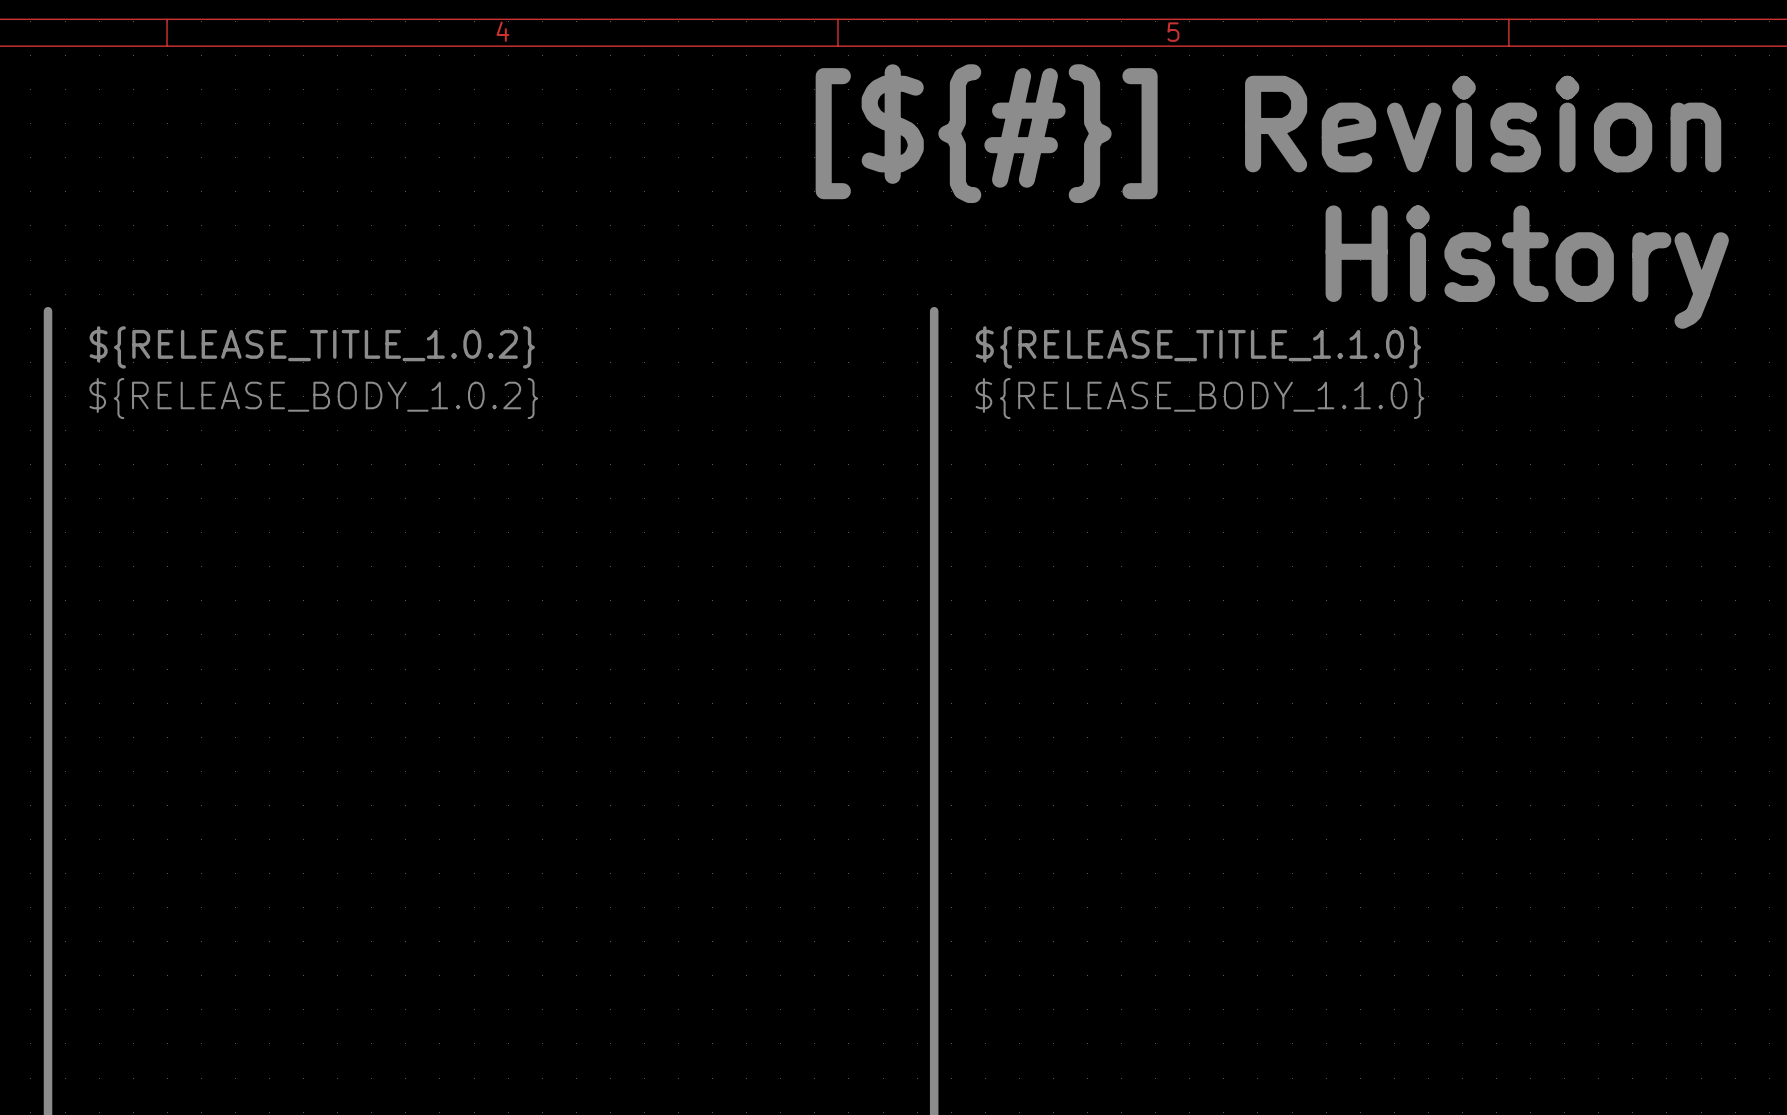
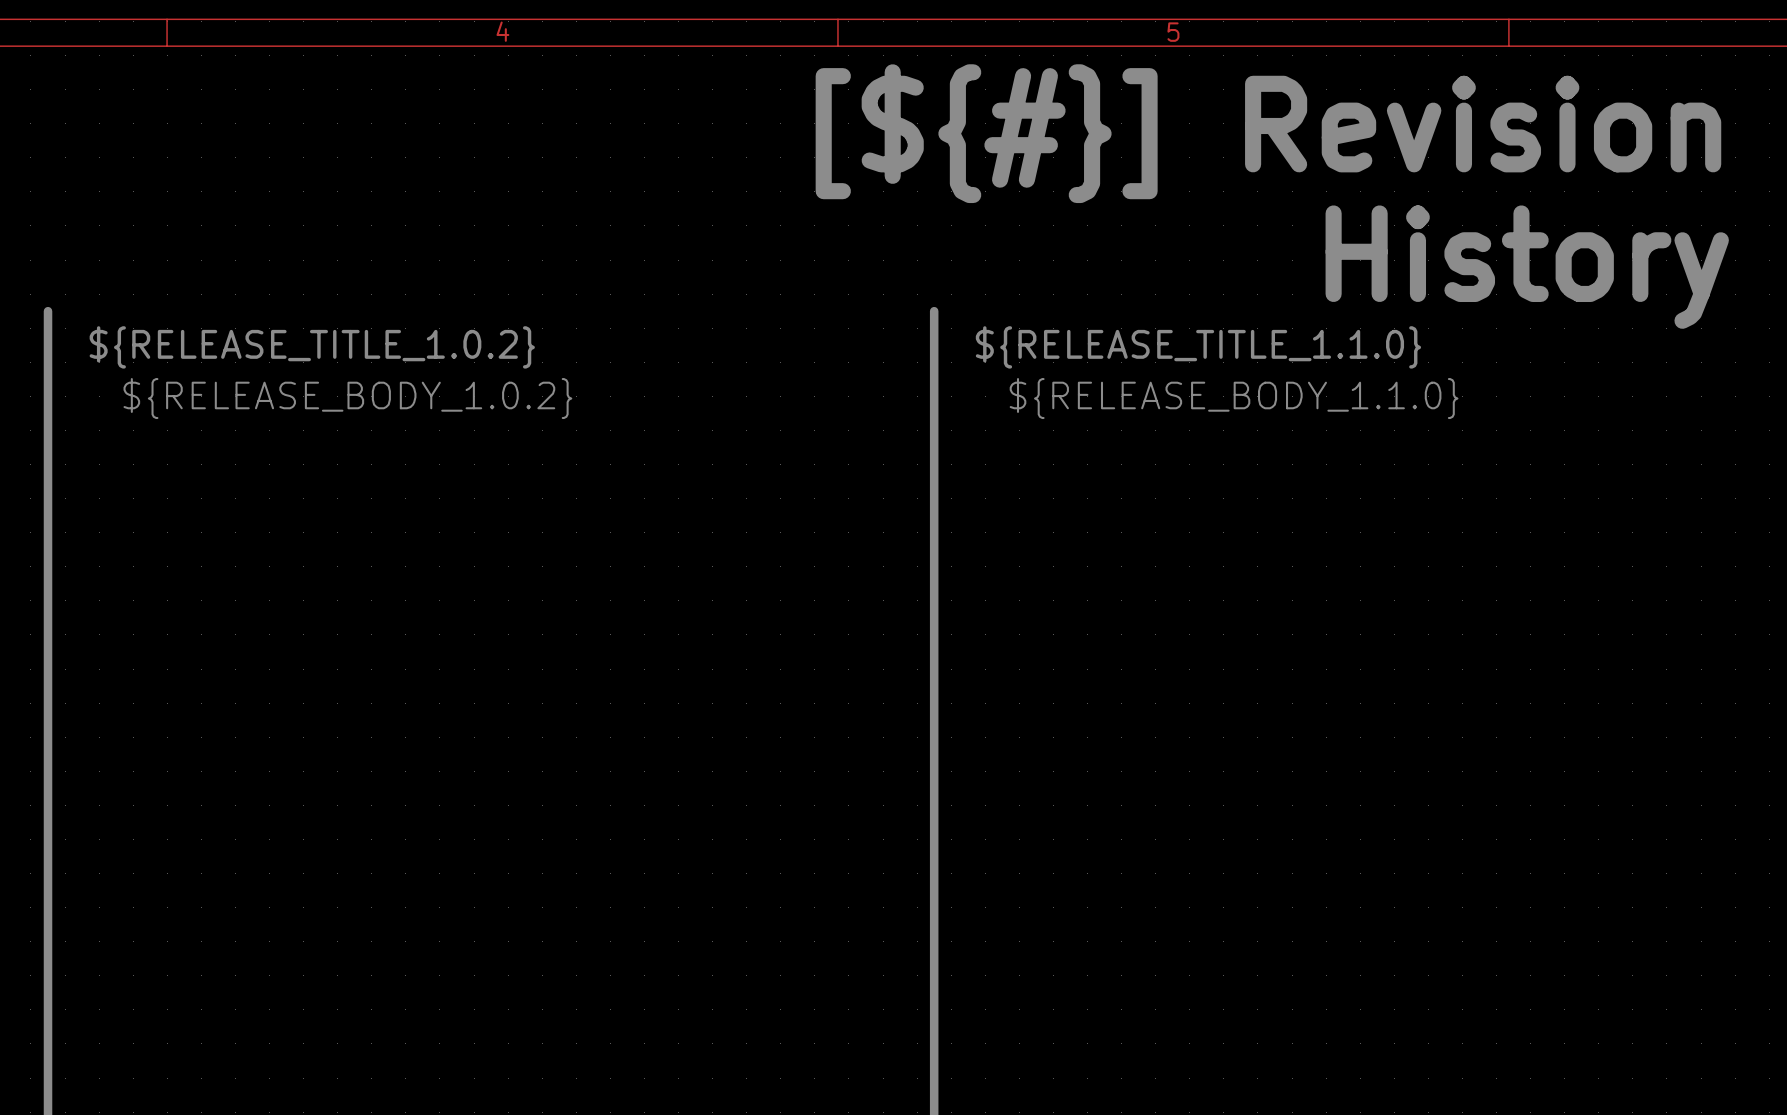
text position: ${RELEASE_BODY_1.0.2} (313, 398) -> ${RELEASE_BODY_1.0.2} (347, 398)
text position: ${RELEASE_BODY_1.1.0} (1199, 398) -> ${RELEASE_BODY_1.1.0} (1234, 398)

